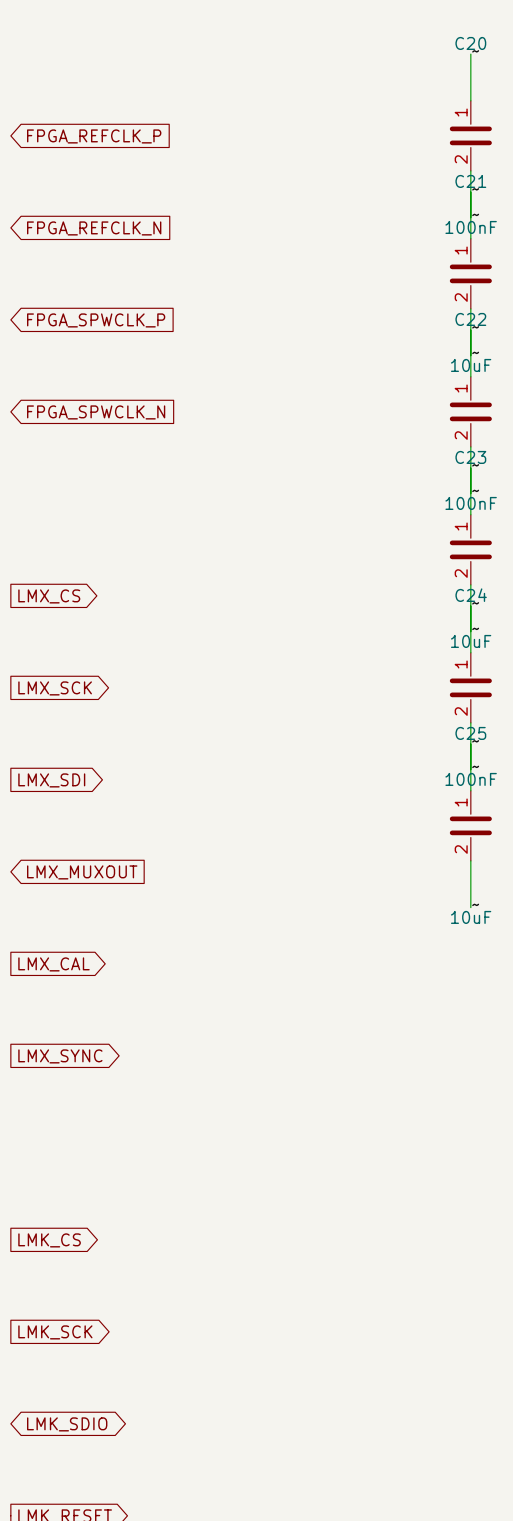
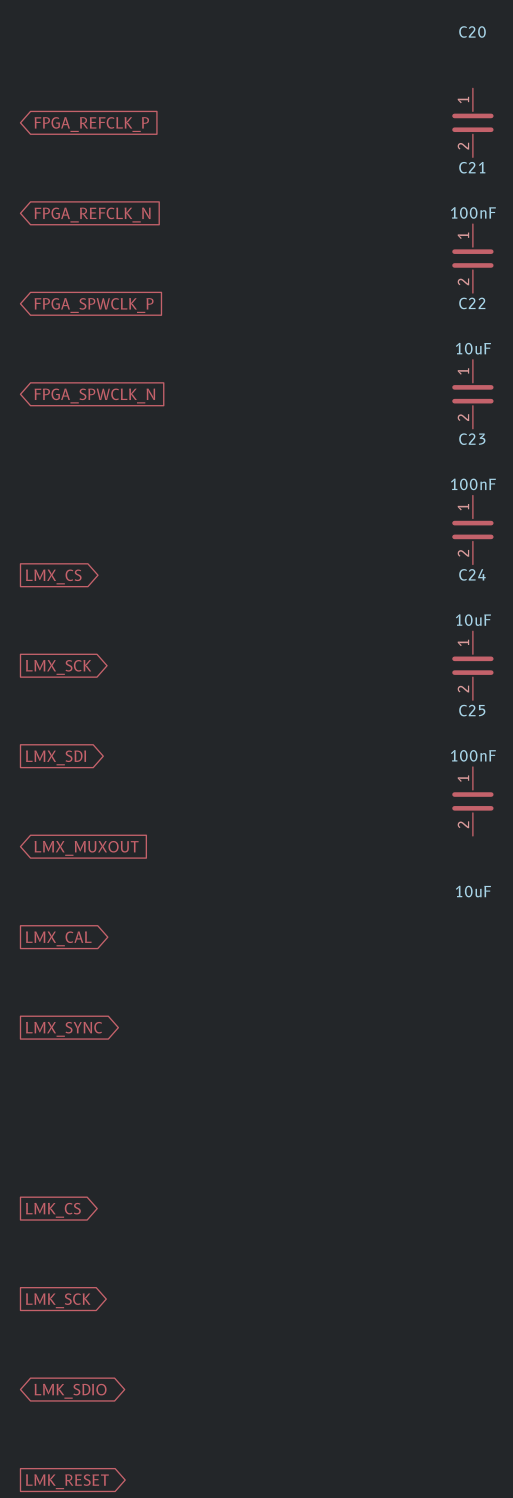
label: ~ (475, 51) -> none
wire: (470, 54) (470, 100) -> none
wire: (470, 170) (470, 238) -> none
label: ~ (475, 189) -> none
label: ~ (475, 214) -> none
wire: (470, 308) (470, 376) -> none
label: ~ (475, 327) -> none
label: ~ (475, 352) -> none
wire: (470, 446) (470, 514) -> none
label: ~ (475, 465) -> none
label: ~ (475, 490) -> none
wire: (470, 584) (470, 652) -> none
label: ~ (475, 603) -> none
label: ~ (475, 628) -> none
wire: (470, 722) (470, 790) -> none
label: ~ (475, 741) -> none
label: ~ (475, 766) -> none
wire: (470, 860) (470, 907) -> none
label: ~ (475, 904) -> none

